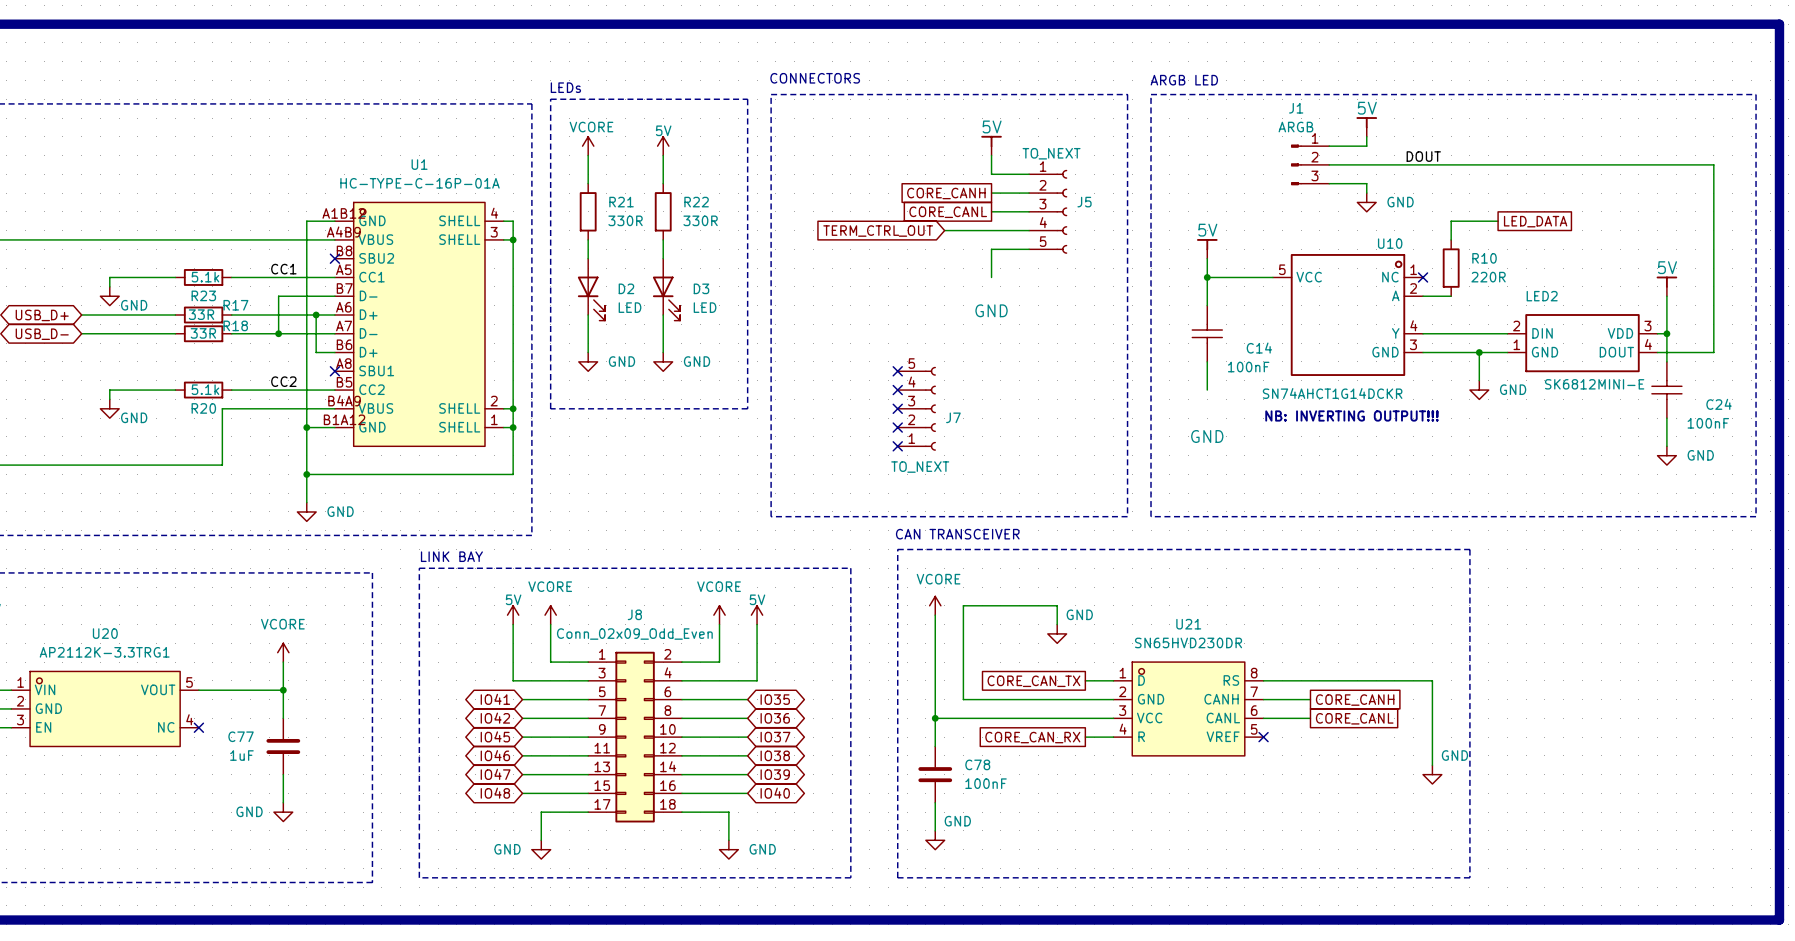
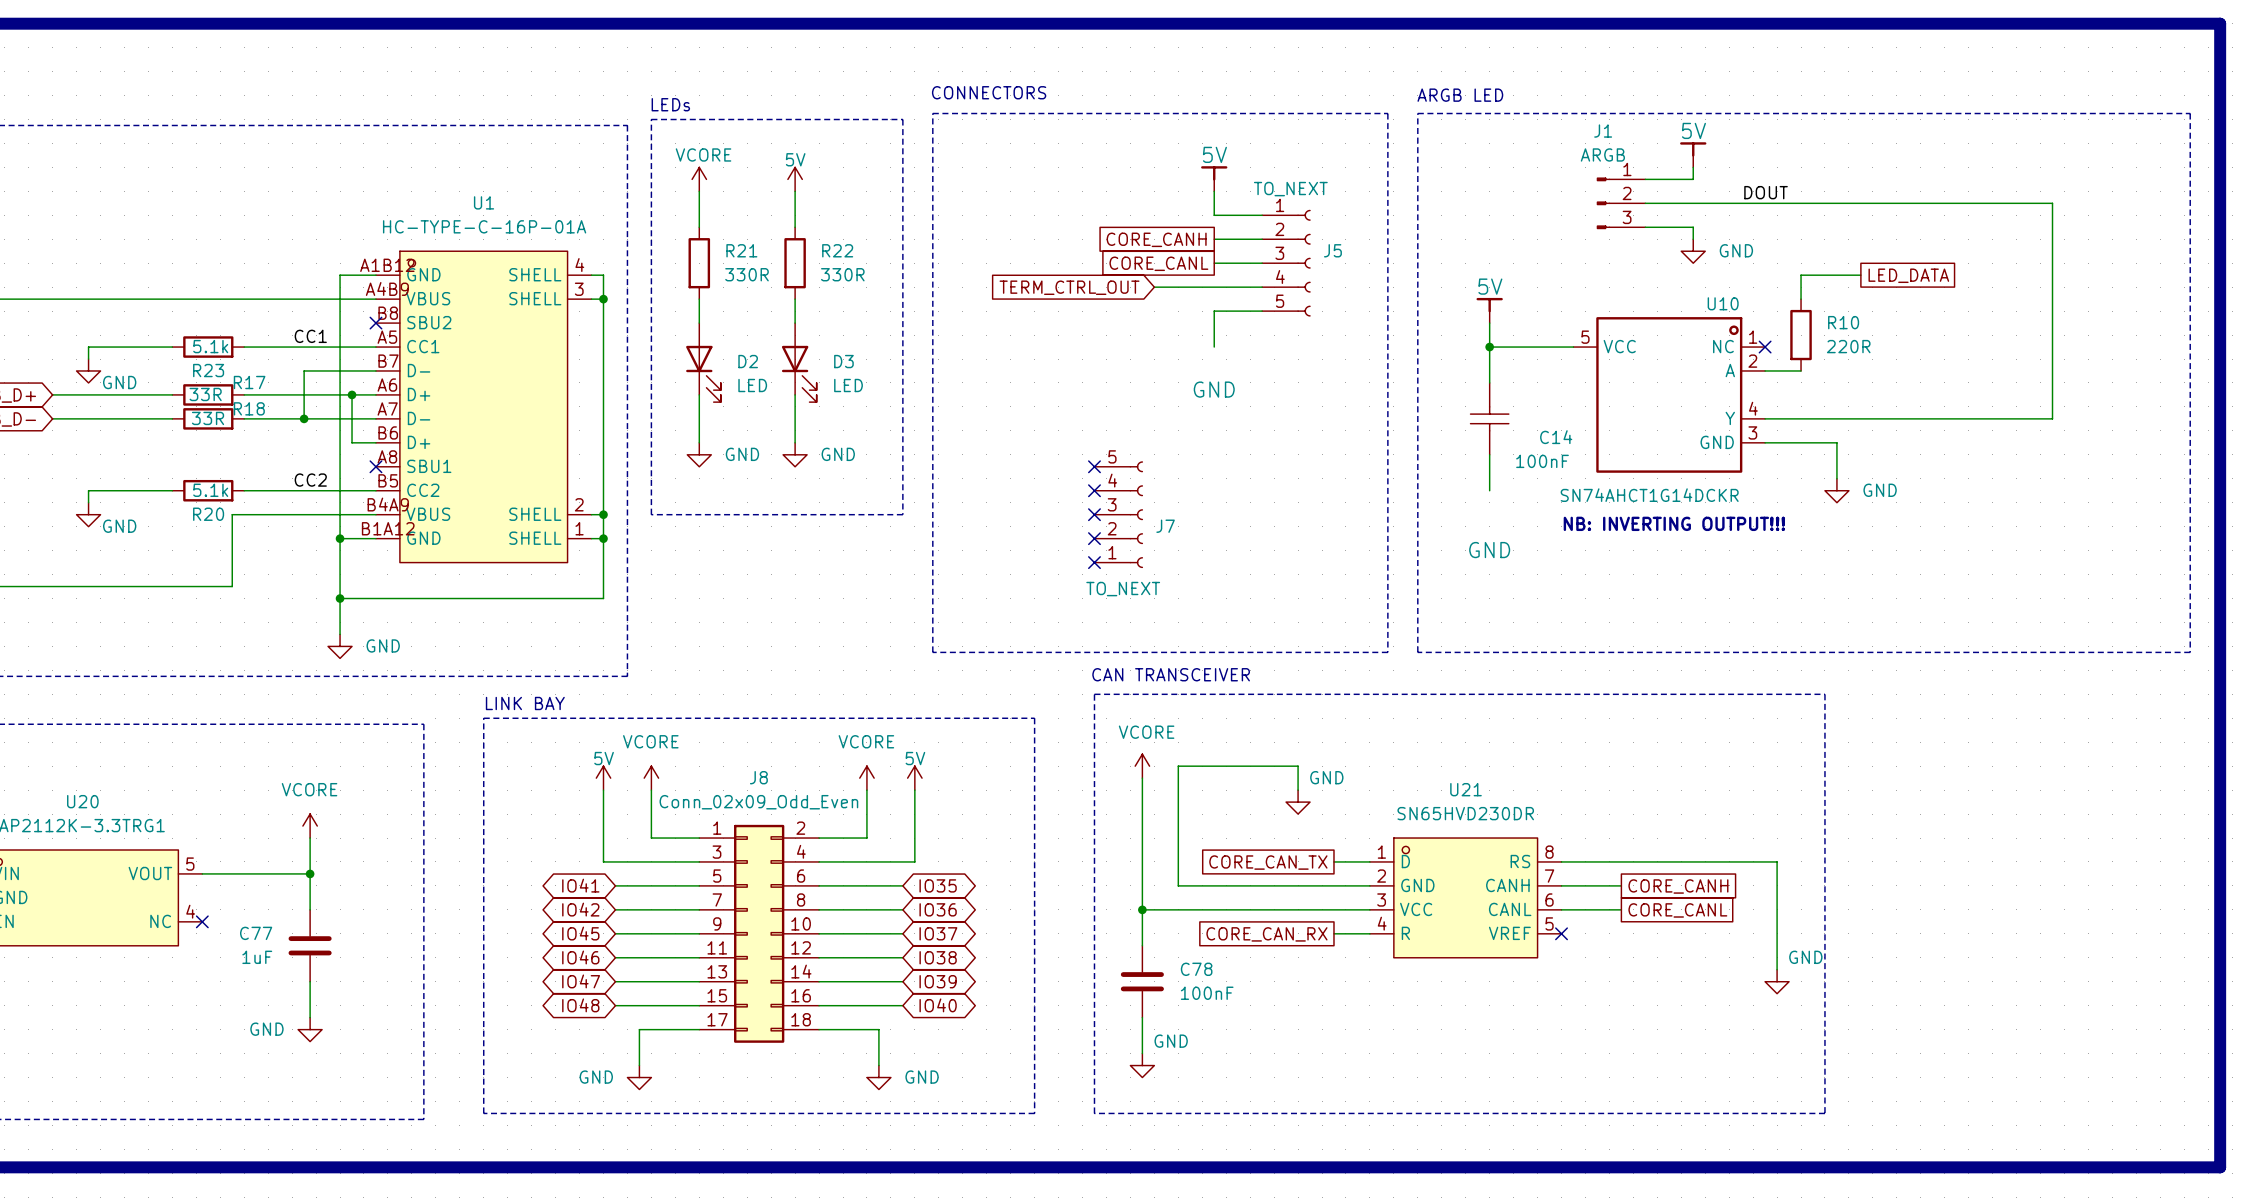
wire: (1648, 164) (1713, 164) (1713, 352) (1657, 352) -> (2052, 203) (2052, 418) (1872, 418)
power symbol: 5V (1666, 286) -> none
wire: (1666, 296) (1666, 361) -> none
wire: (1657, 333) (1666, 333) -> none
junction: (1666, 333) -> none
LED2: SK6812MINI-E (1582, 343) -> none
wire: (1479, 352) (1507, 352) -> none
junction: (1479, 352) -> none
C24: 100nF (1666, 390) -> none
wire: (1666, 418) (1666, 446) -> none
power symbol: GND (1666, 455) -> none

